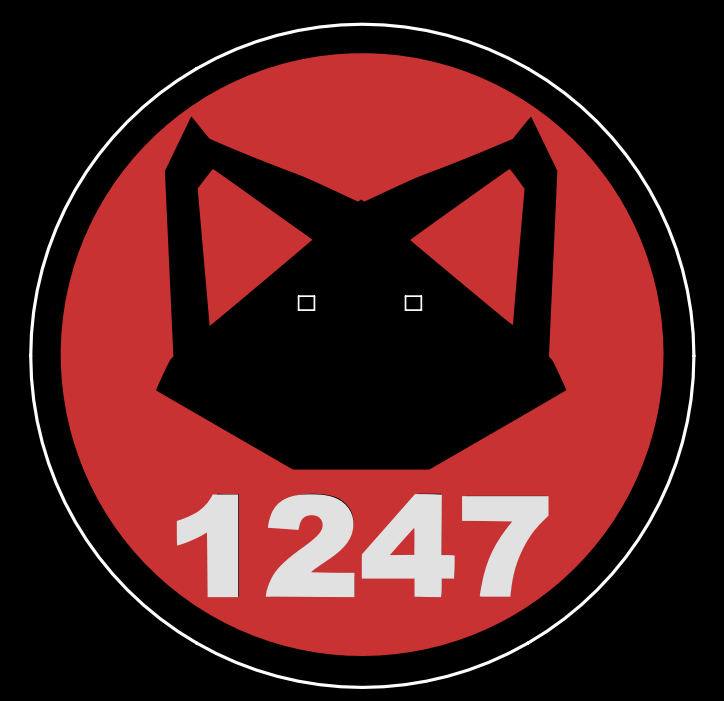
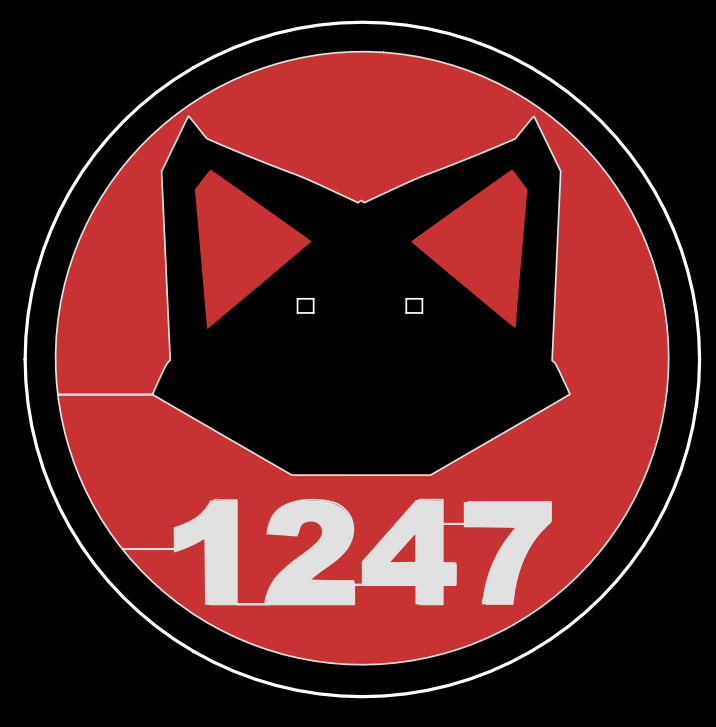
drawing shape: [60, 53, 664, 657] -> [55, 51, 669, 665]

